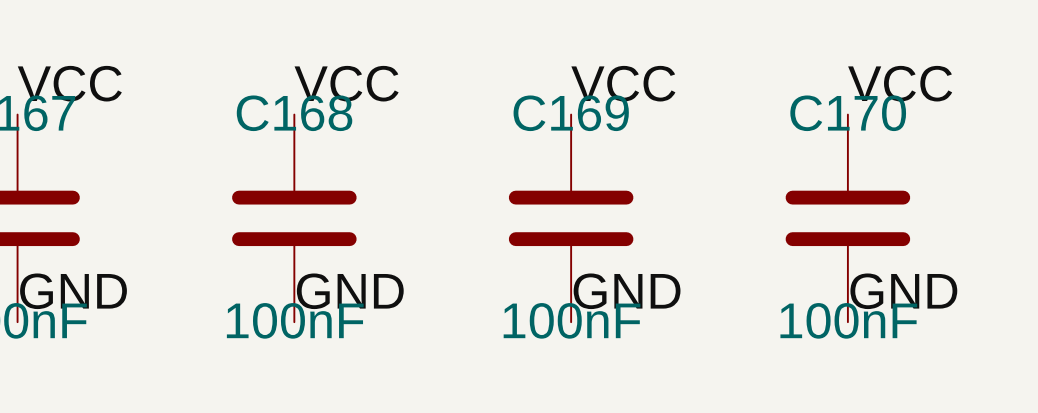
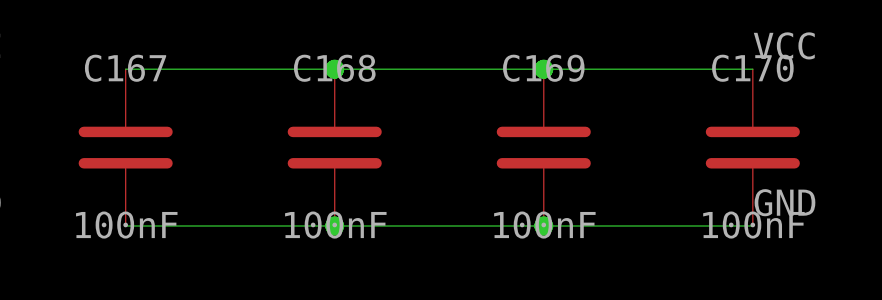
label: VCC (69, 83) -> none
label: VCC (346, 83) -> none
label: VCC (623, 83) -> none
wire: none -> (125, 69) (752, 69)
junction: none -> (334, 69)
junction: none -> (543, 69)
label: GND (73, 291) -> none
label: GND (350, 291) -> none
label: GND (627, 291) -> none
wire: none -> (125, 225) (752, 225)
junction: none -> (334, 225)
junction: none -> (543, 225)

